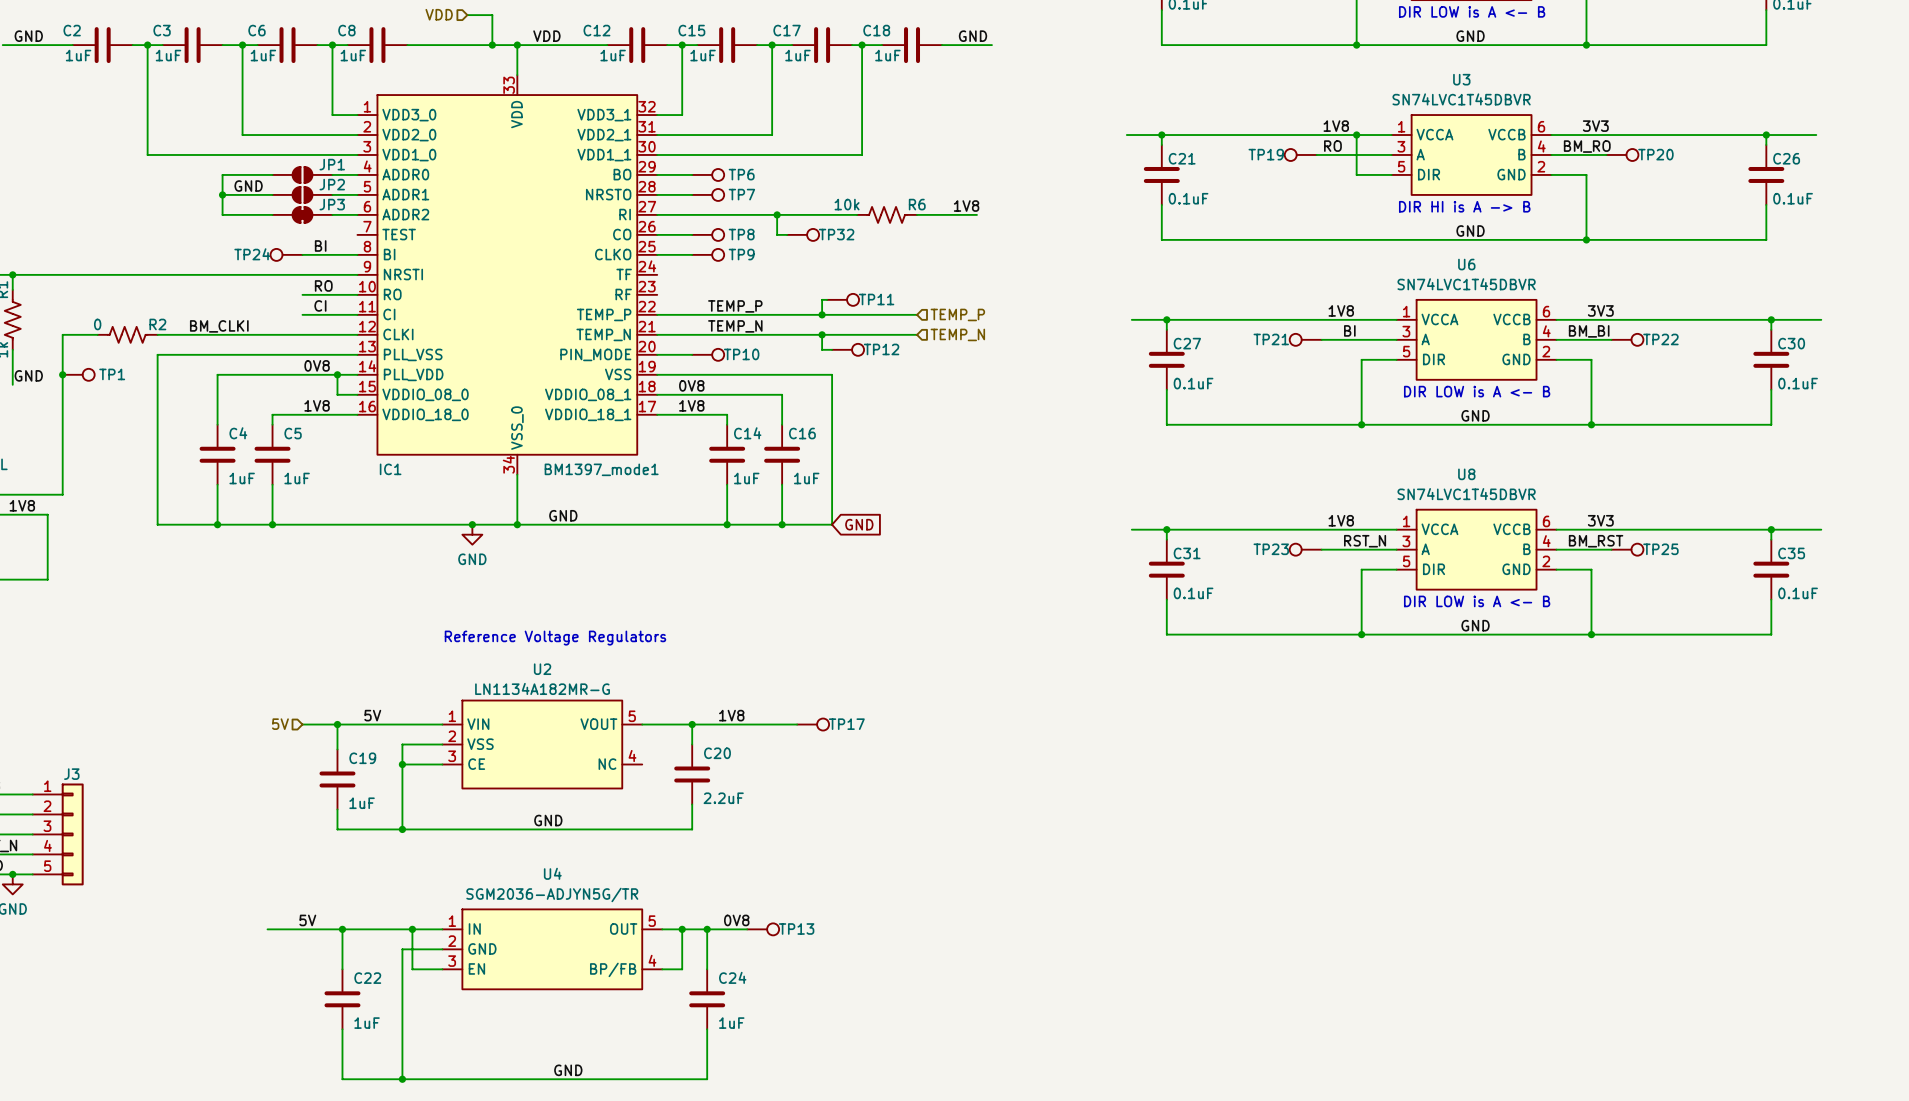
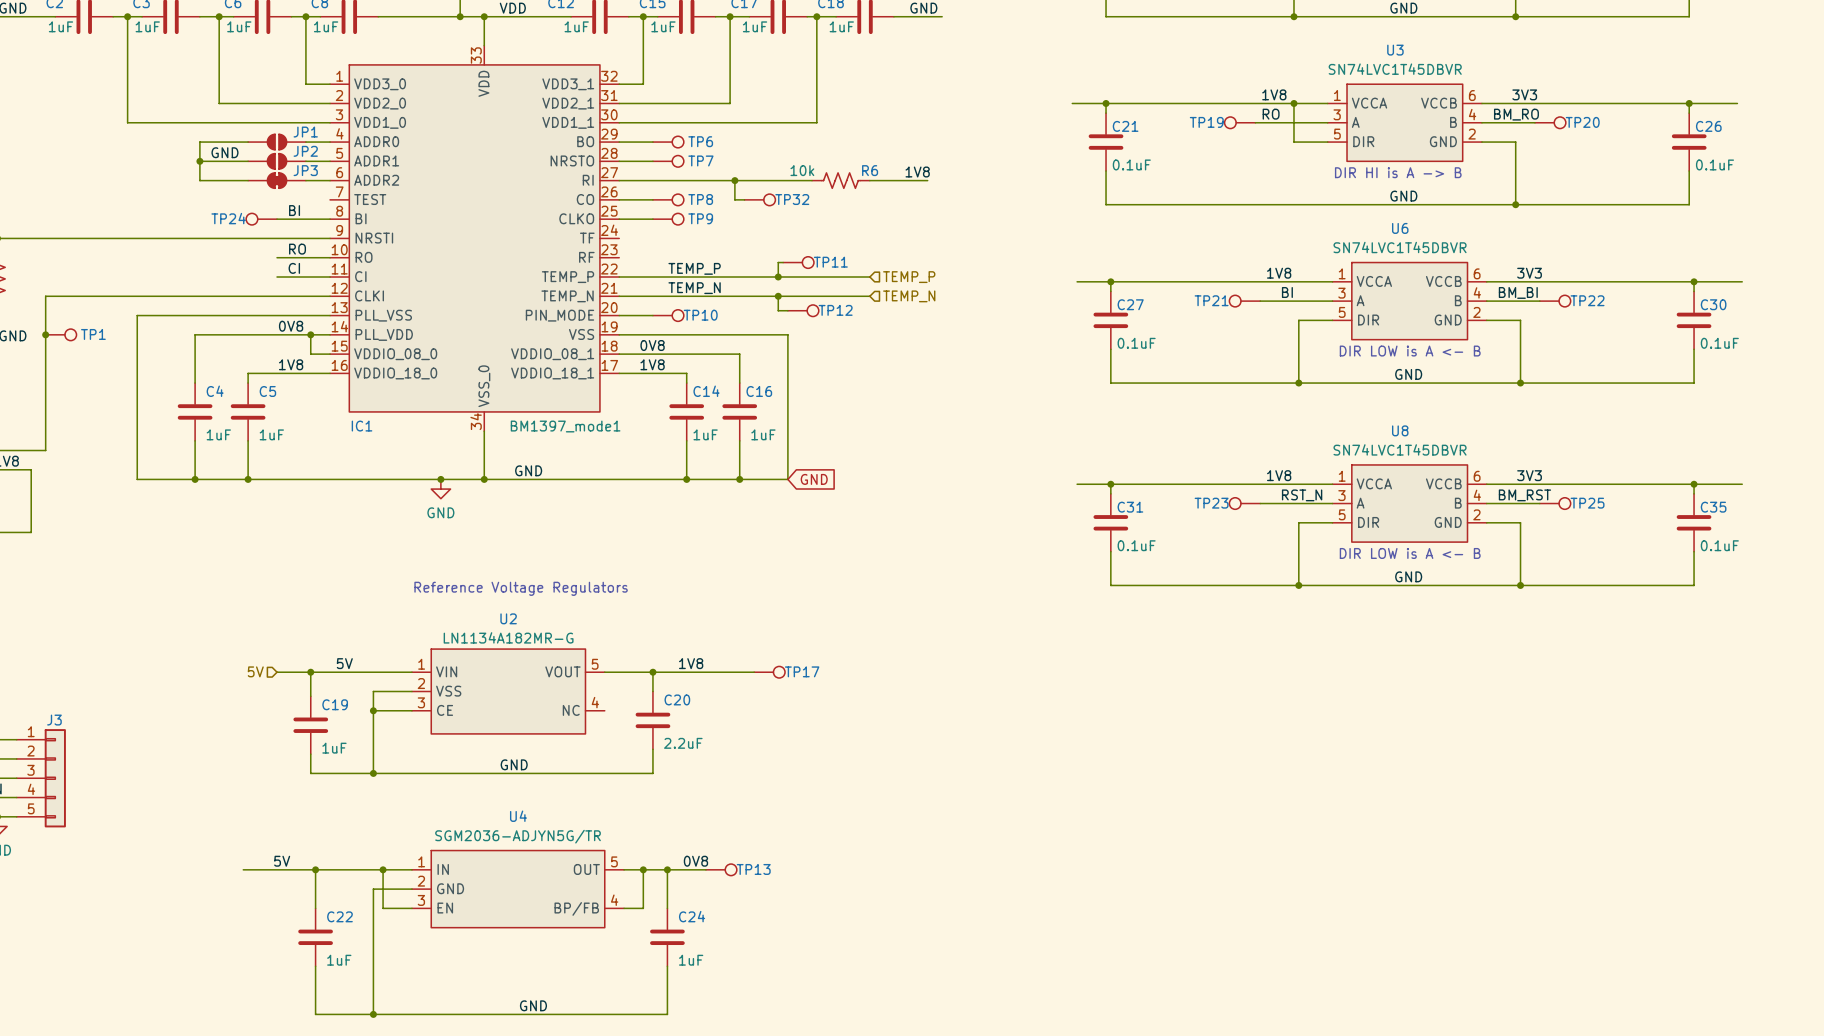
label: BM_CLKI (219, 326) -> none
R2: 0 (127, 334) -> none

